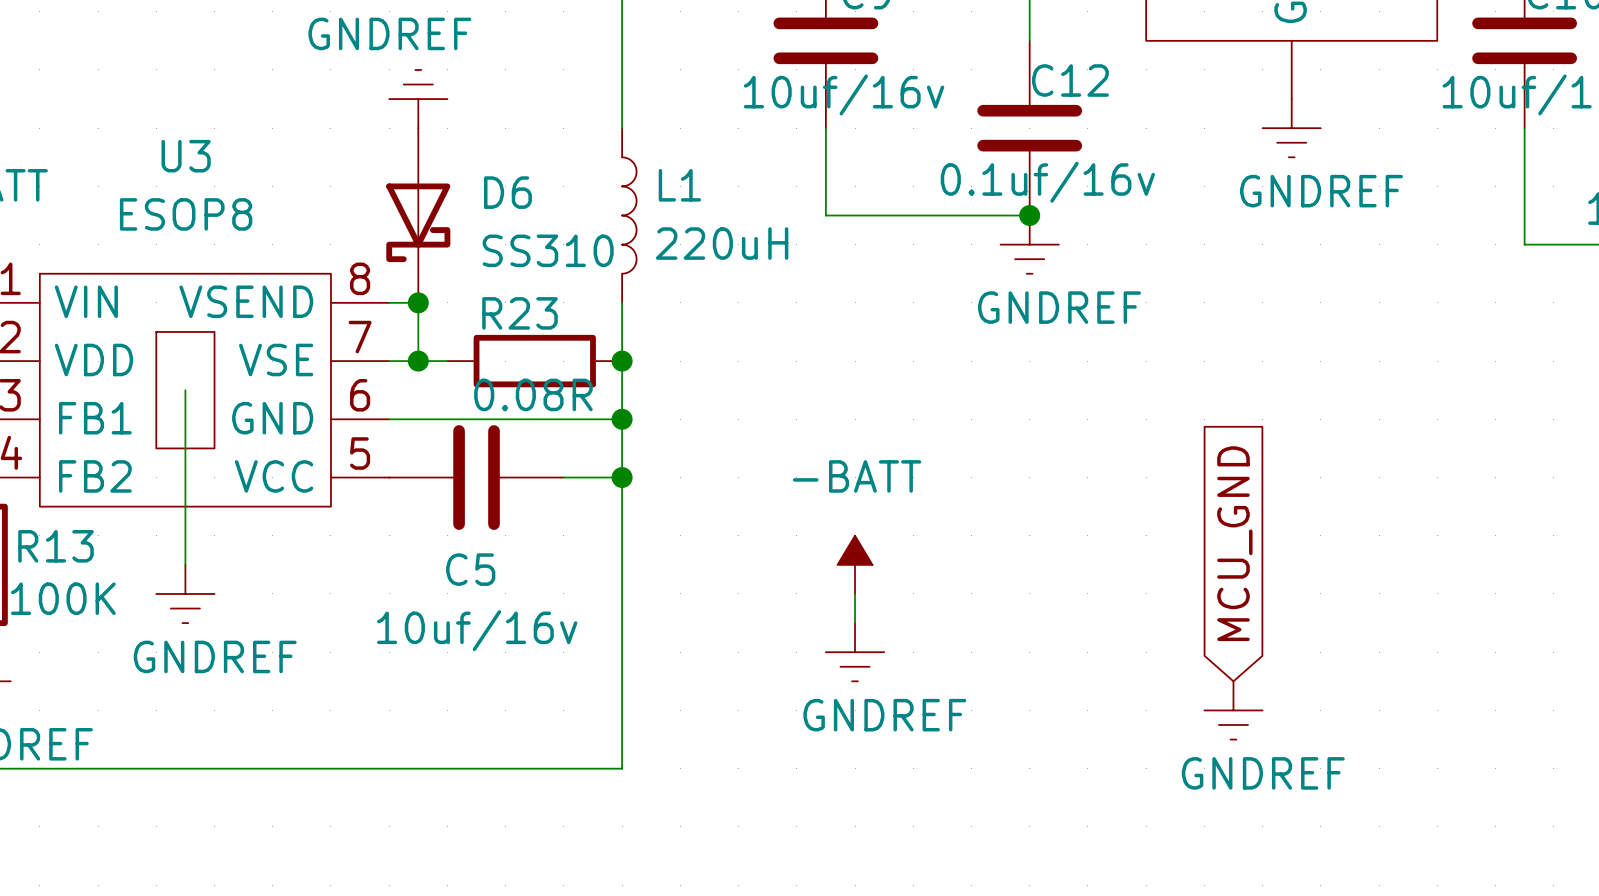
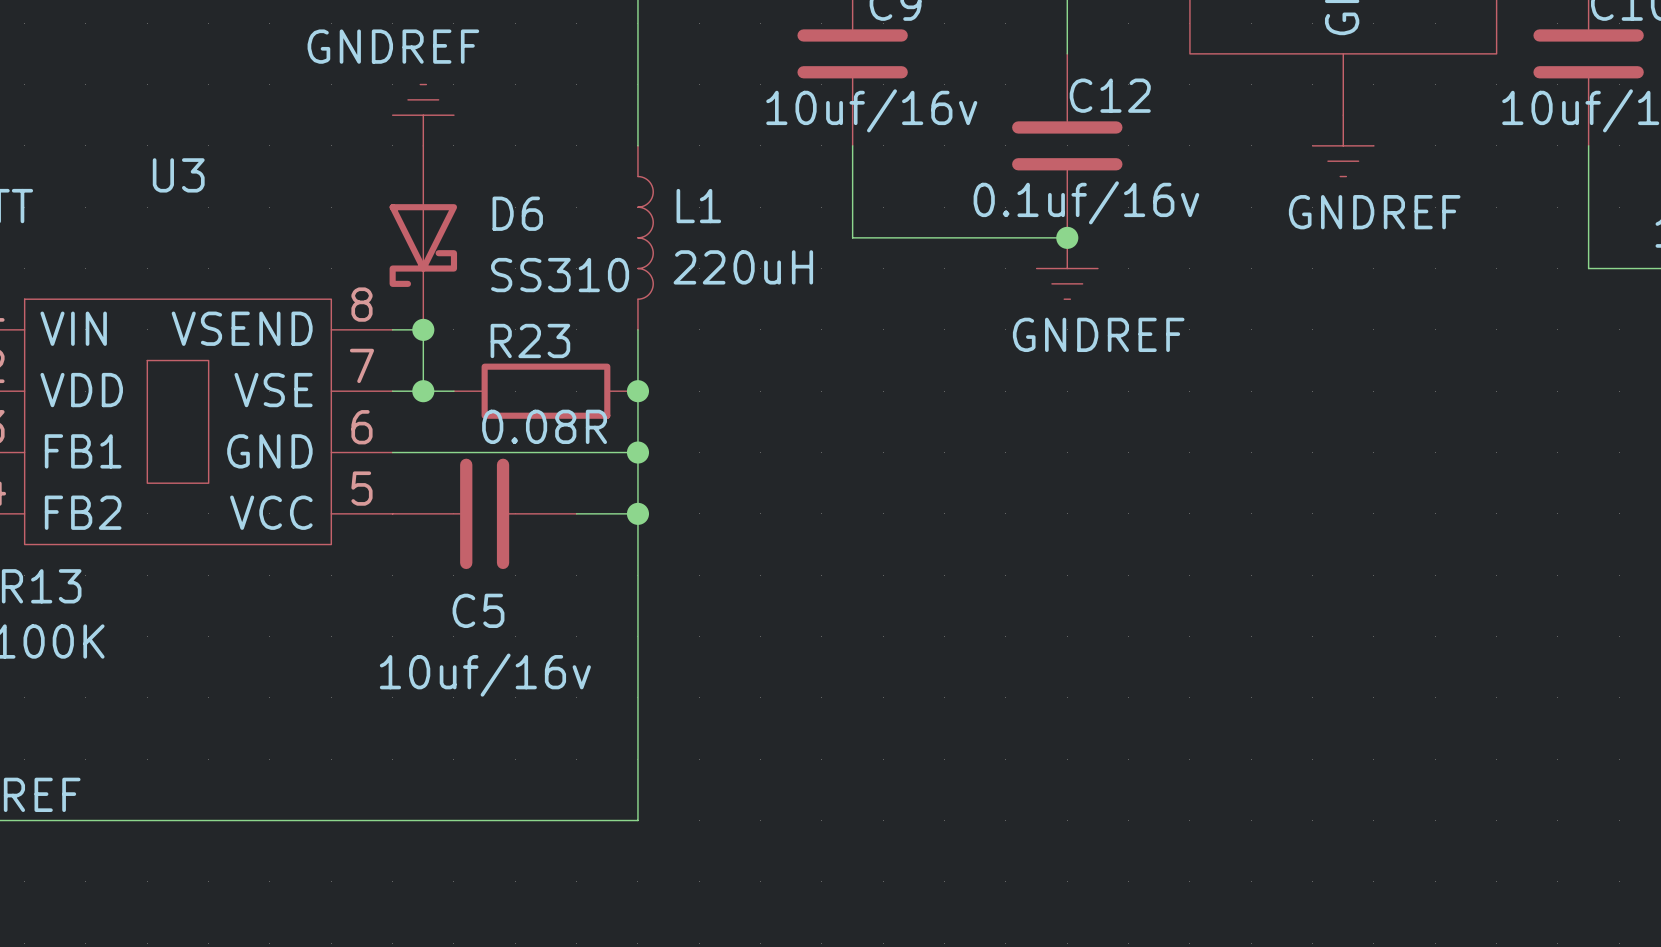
U3 value: ESOP8 (186, 214) -> none
wire: (185, 390) (185, 564) -> none
global label: MCU_GND (1234, 543) -> none
power symbol: -BATT (855, 564) -> none
power symbol: GNDREF (185, 593) -> none
wire: (855, 593) (855, 623) -> none
power symbol: GNDREF (855, 652) -> none
power symbol: GNDREF (1233, 710) -> none

